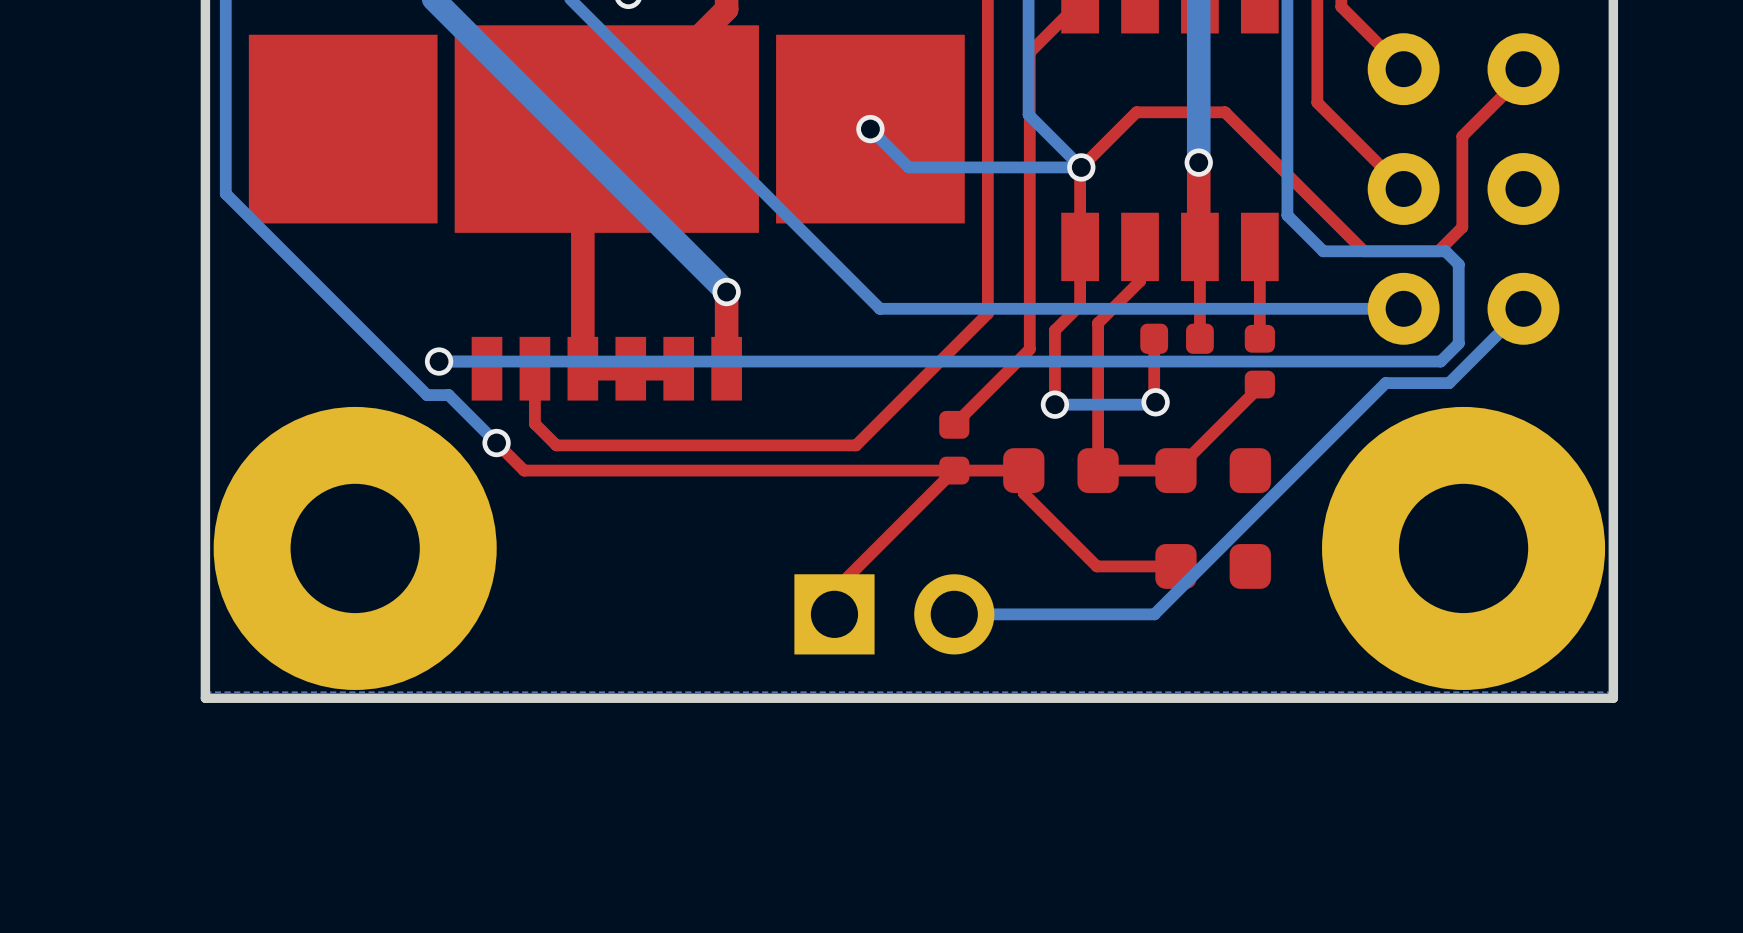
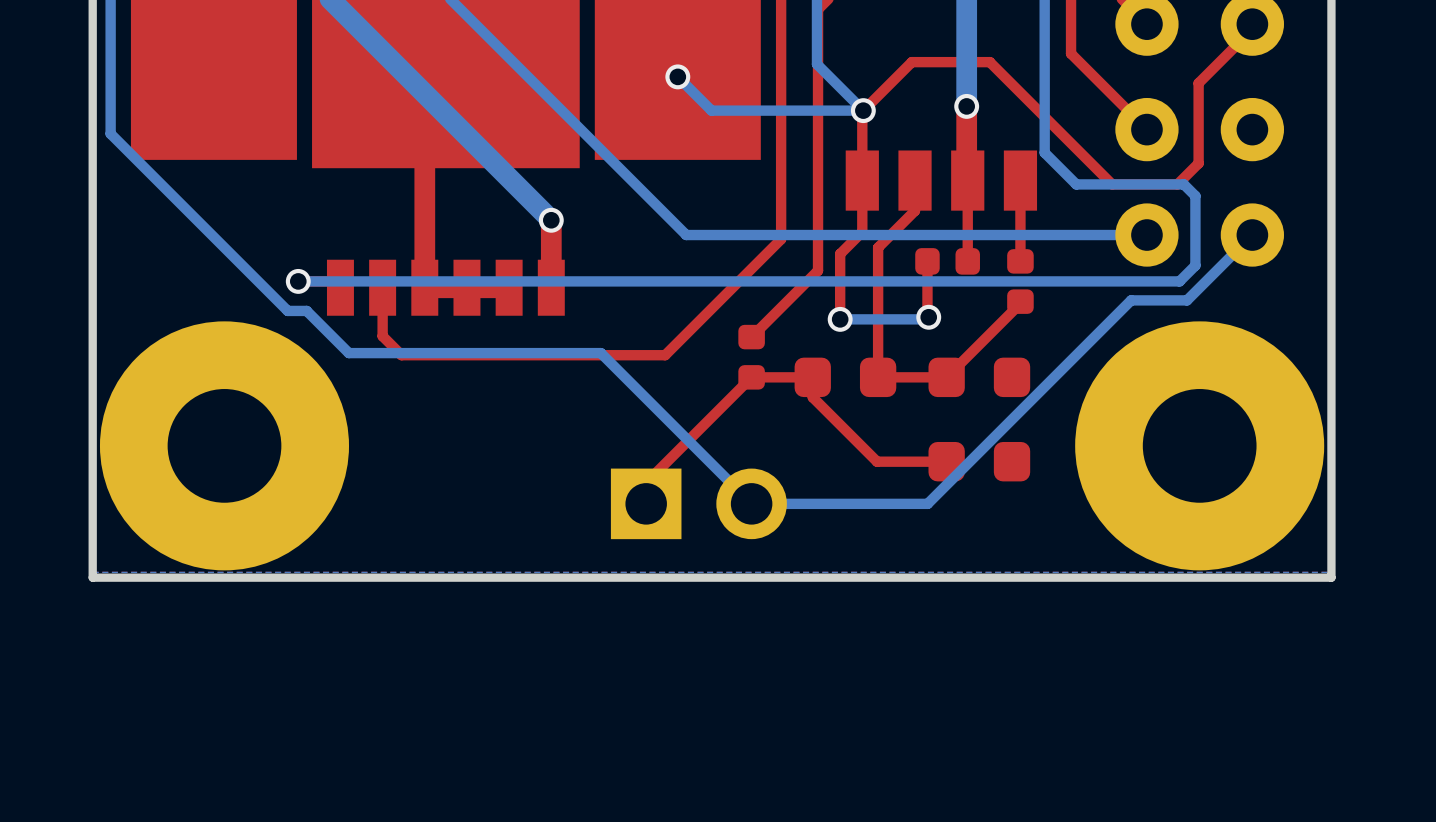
top track: (496, 443) (524, 470) (954, 470) -> none
bottom track: none -> (348, 353) (600, 353) (751, 503)
via: (496, 443) -> none

